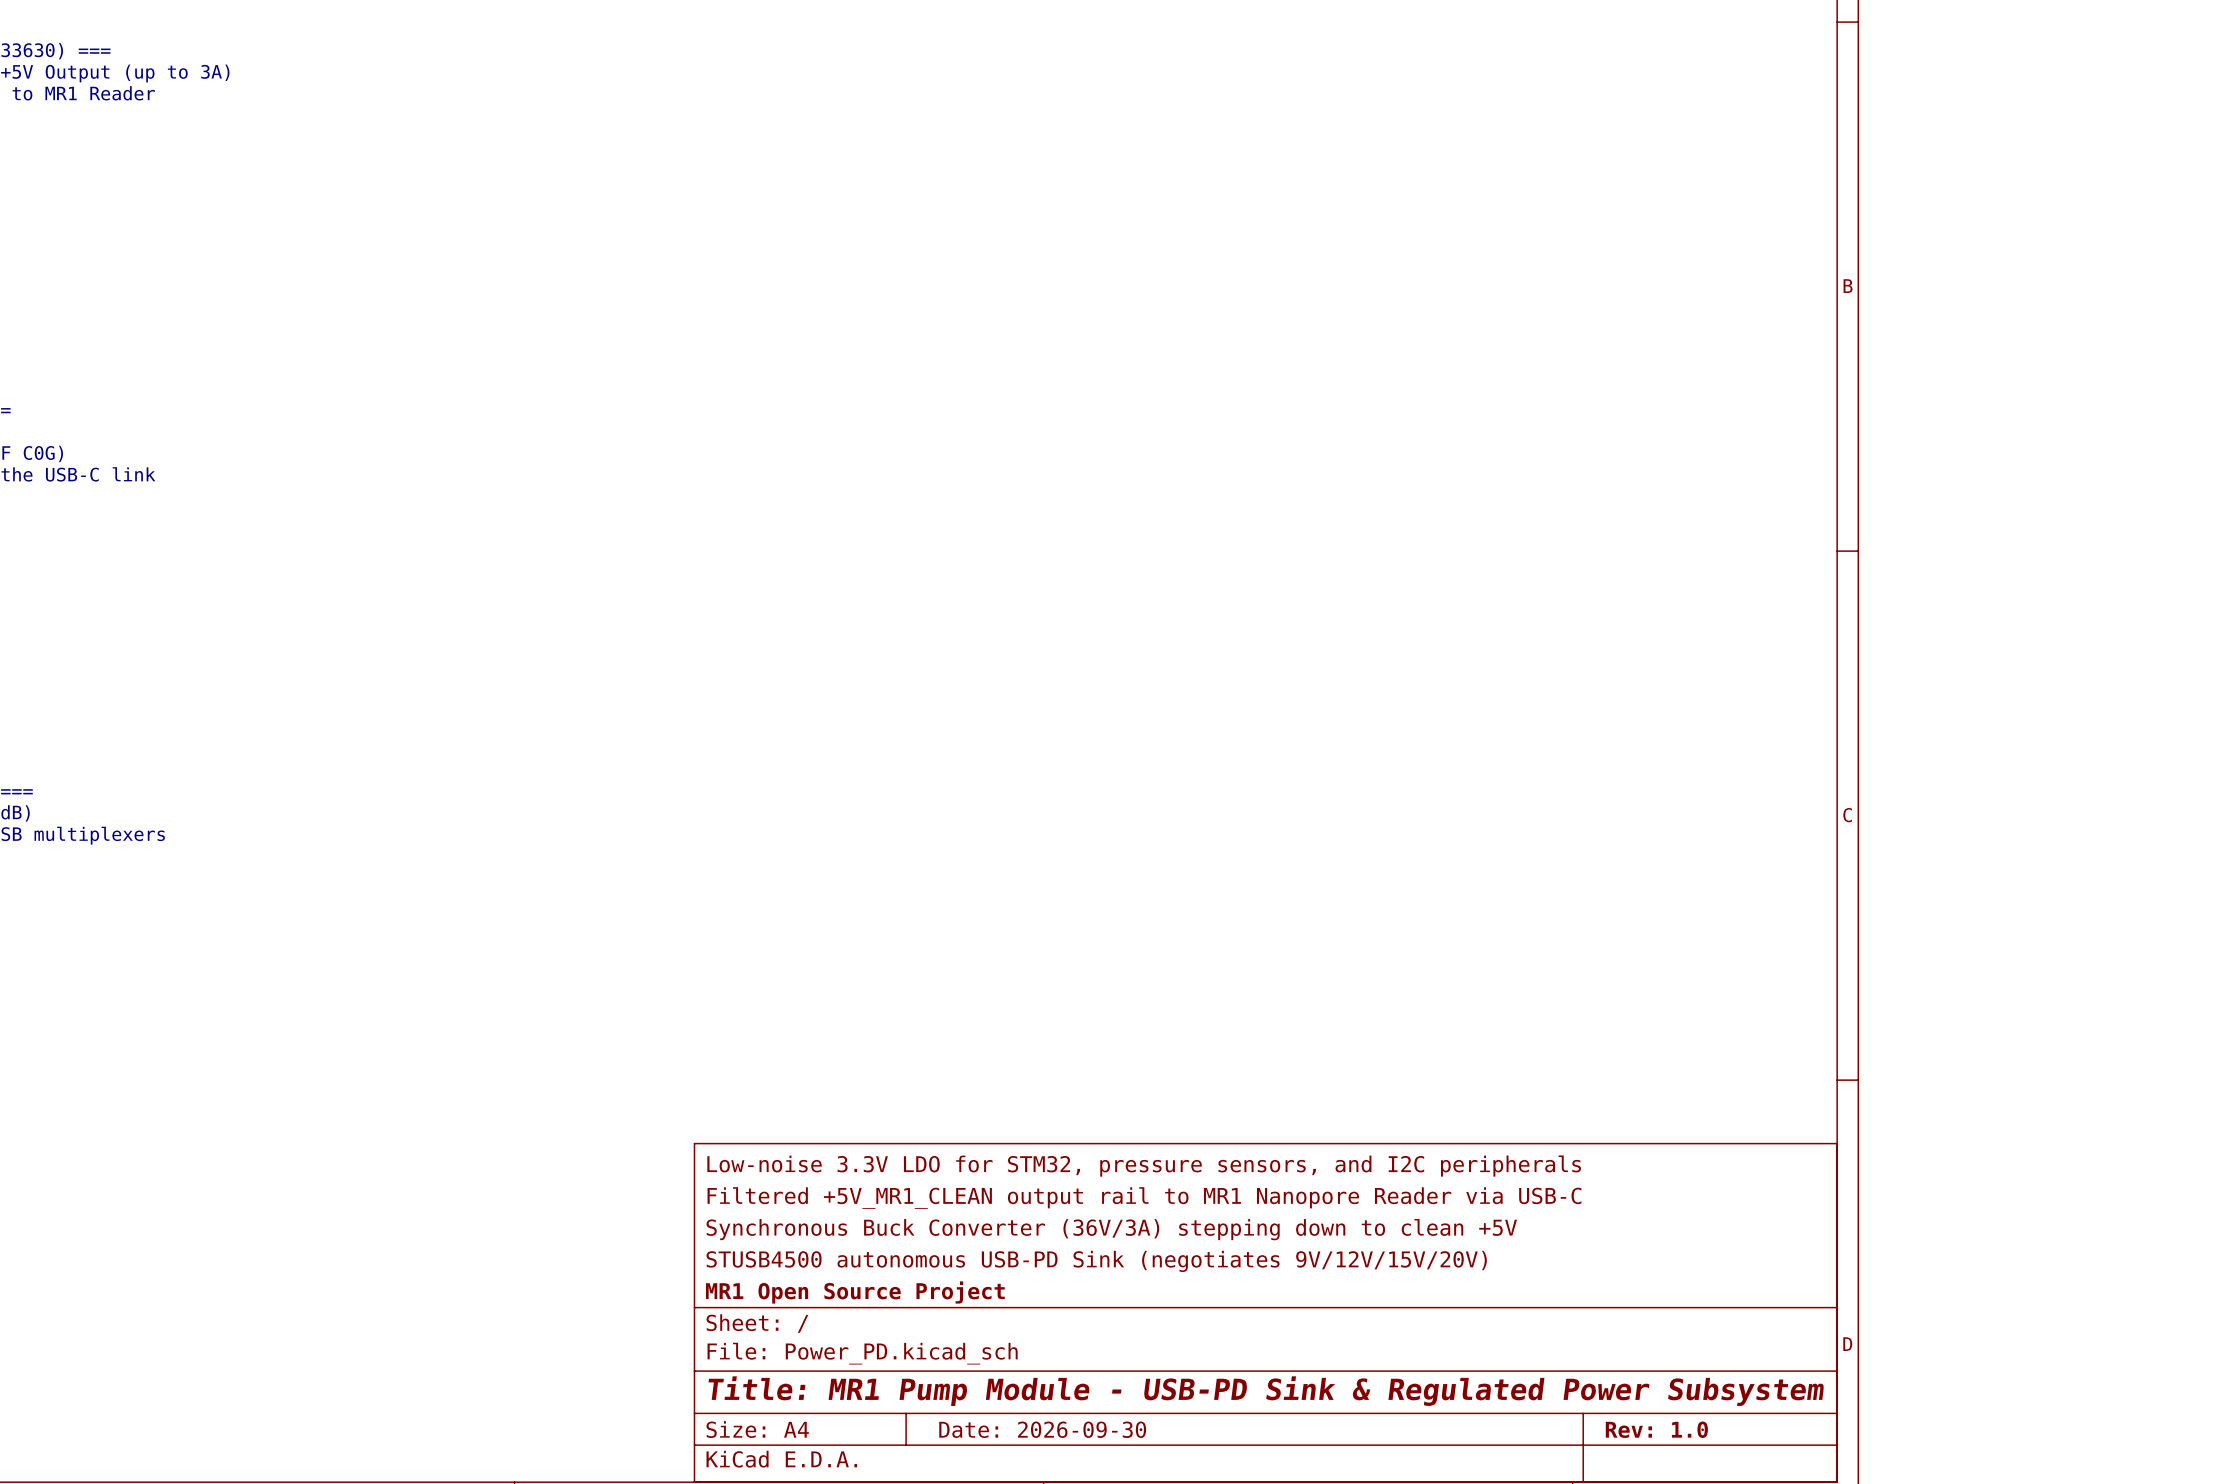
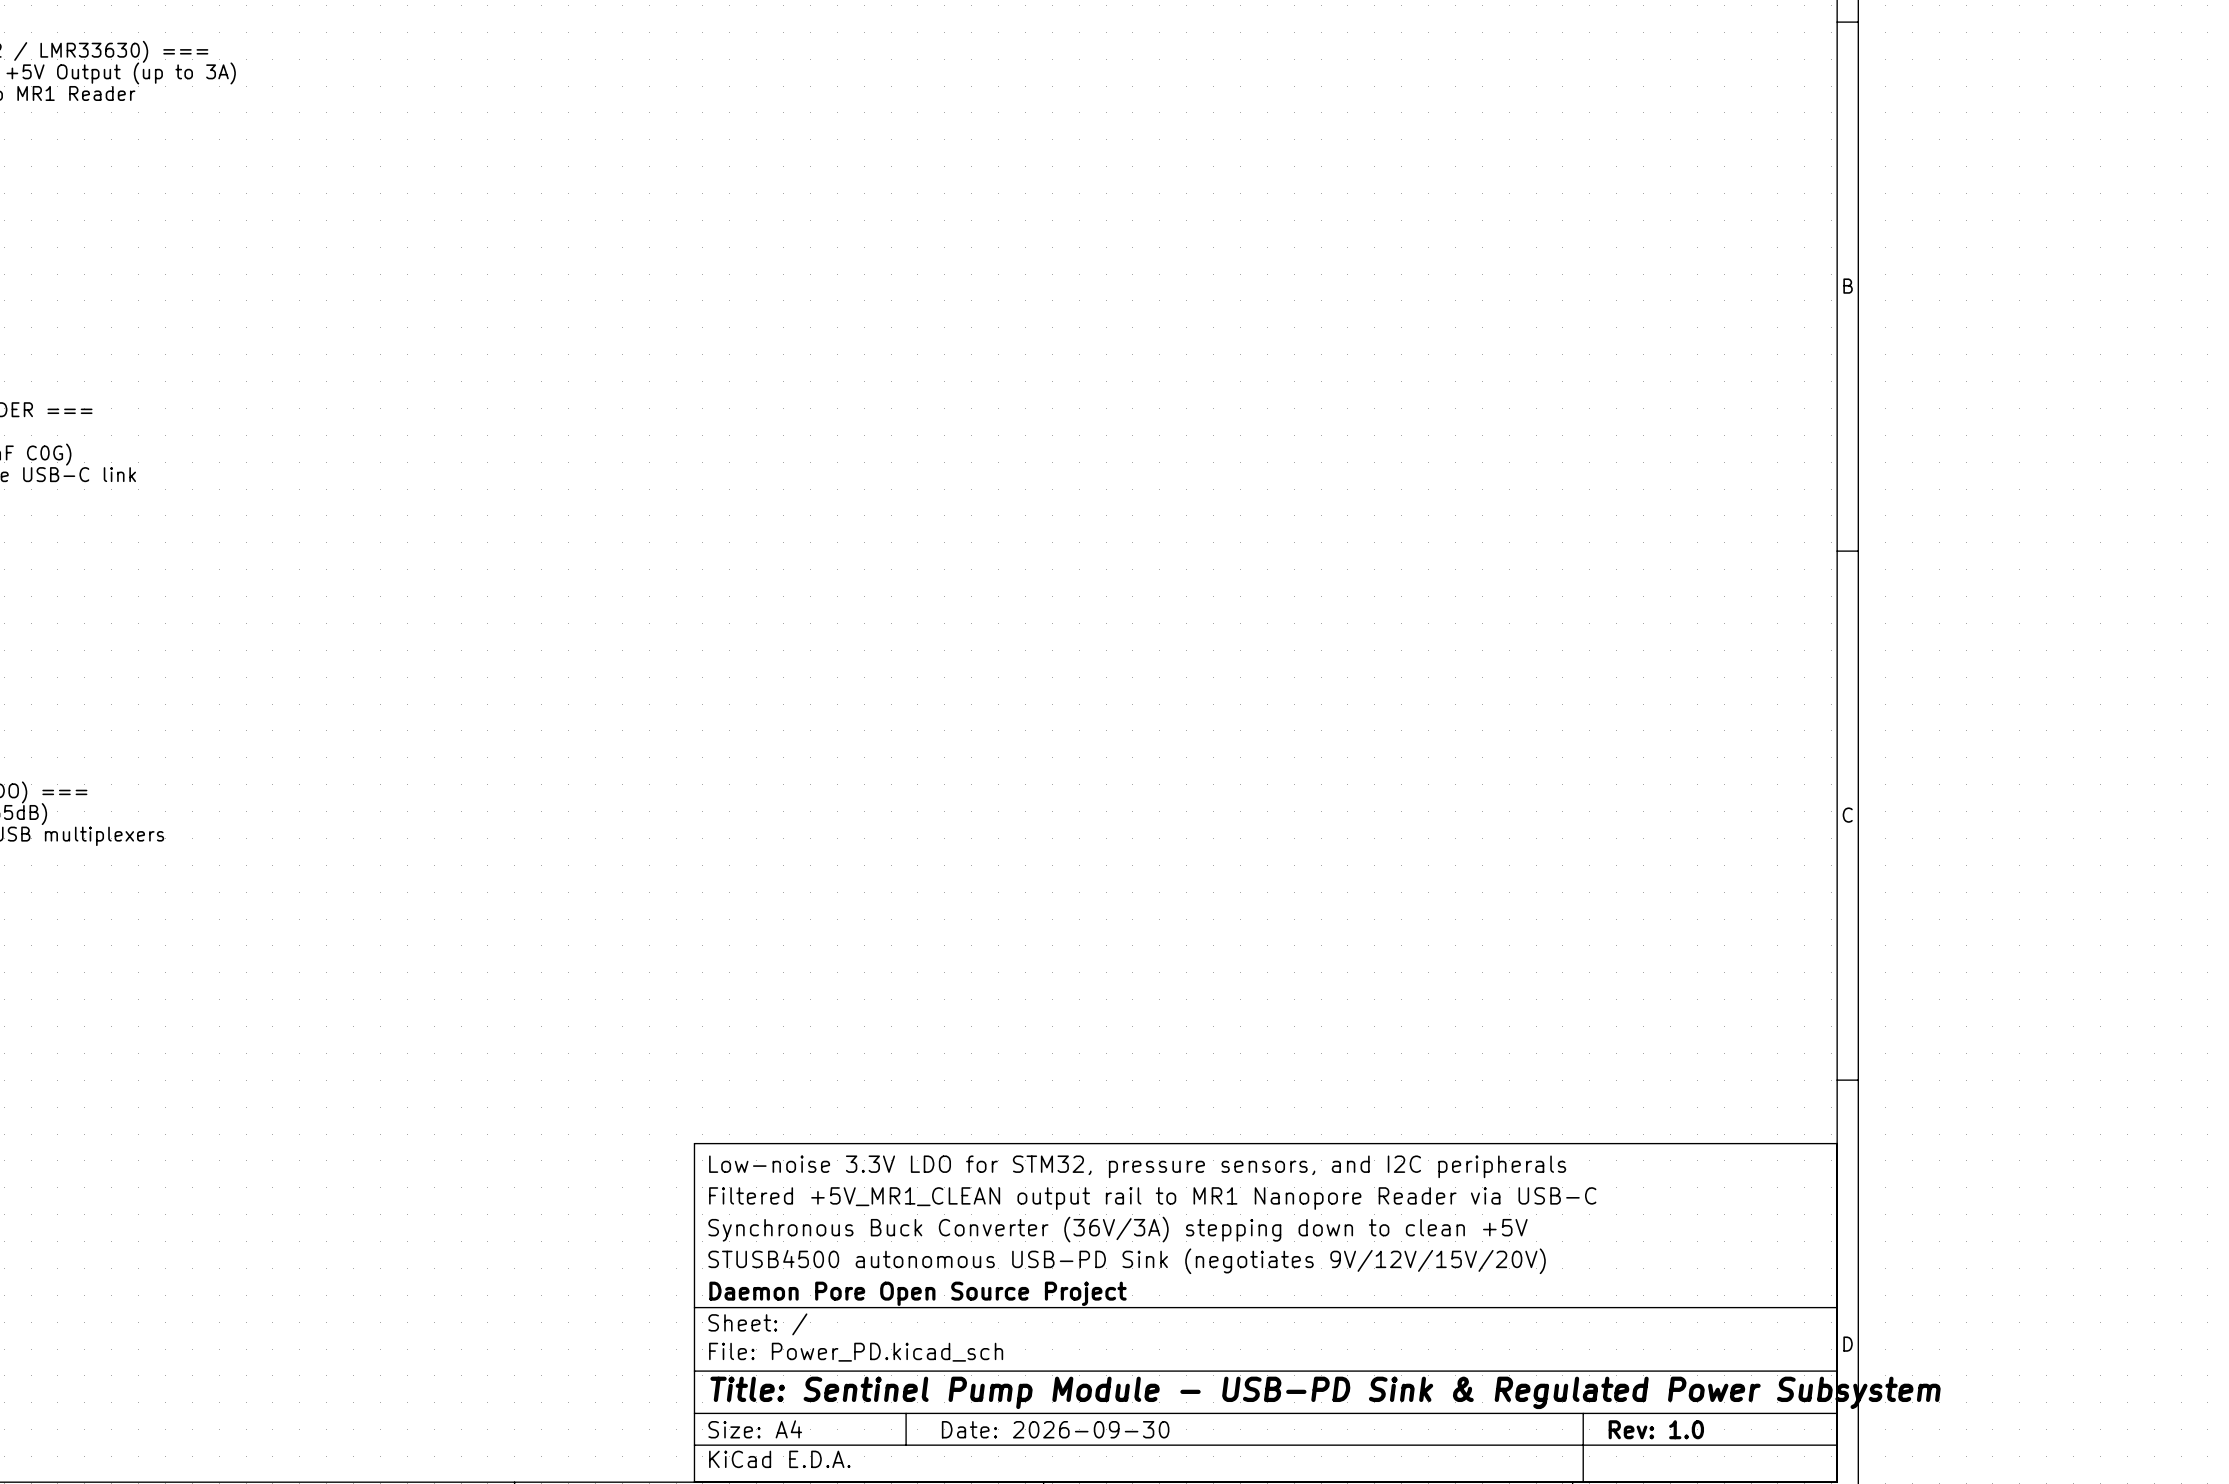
title block: MR1 Open Source Project (855, 1292) -> Daemon Pore Open Source Project (917, 1293)
title block: Title: MR1 Pump Module - USB-PD Sink & Regulated Power Subsystem (1266, 1391) -> Title: Sentinel Pump Module - USB-PD Sink & Regulated Power Subsystem (1325, 1392)

